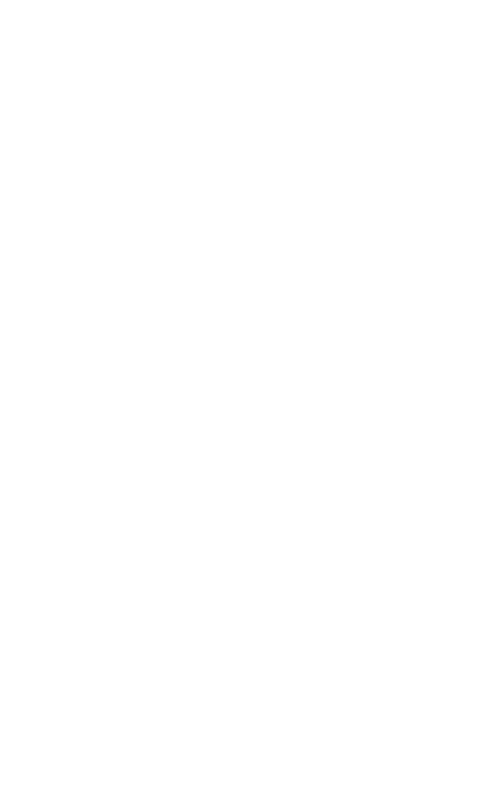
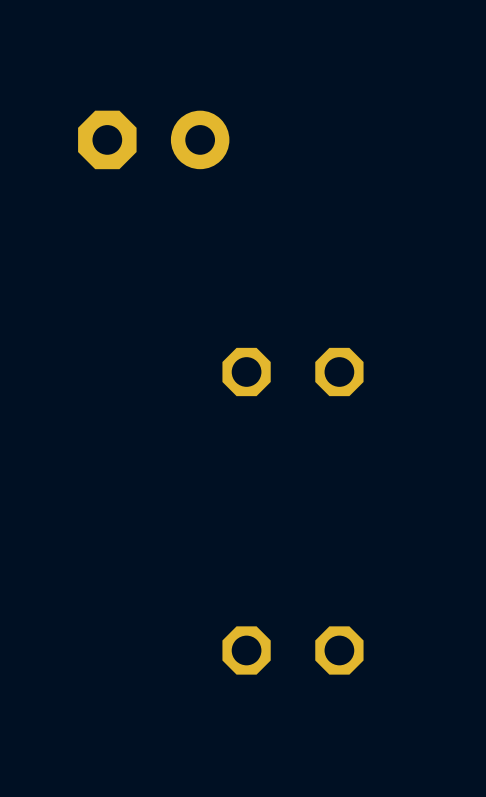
part: none -> (153, 139)
part: none -> (292, 372)
part: none -> (292, 650)

